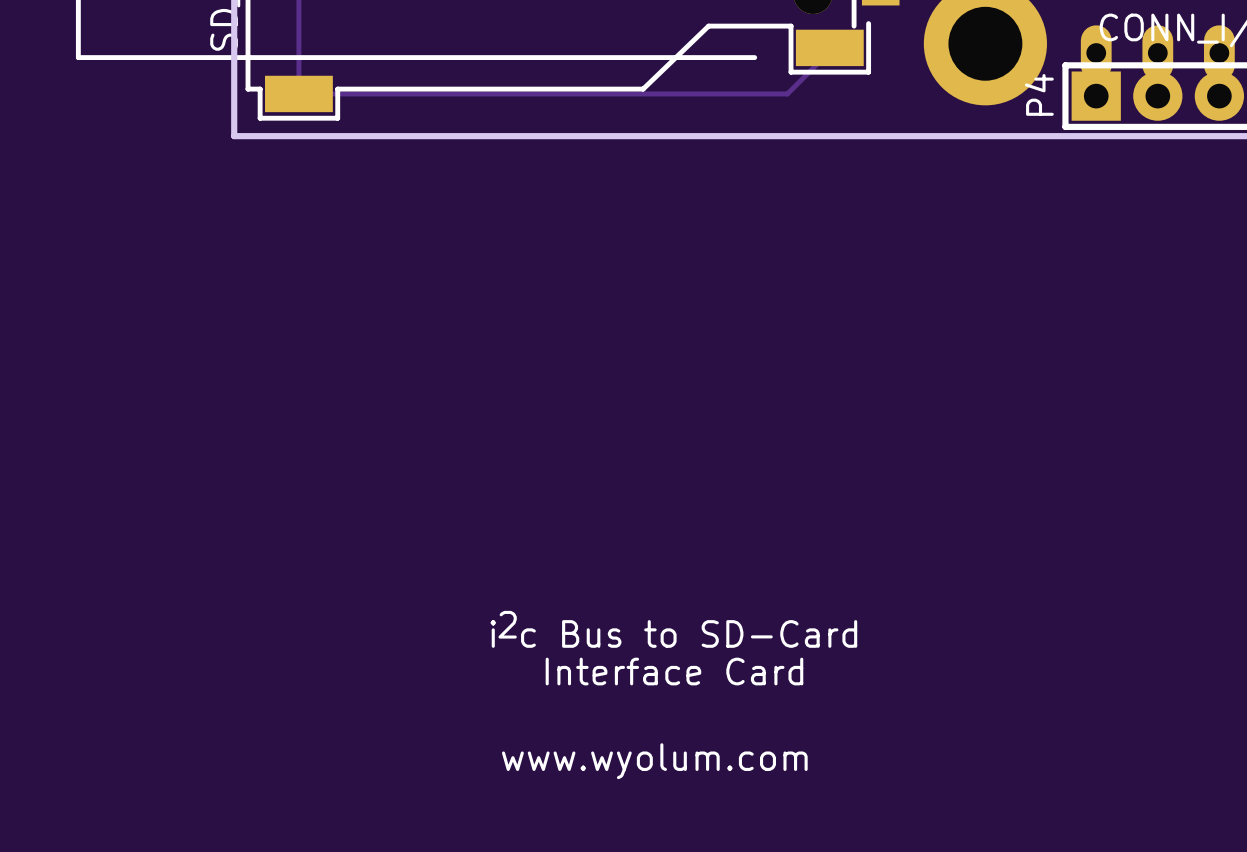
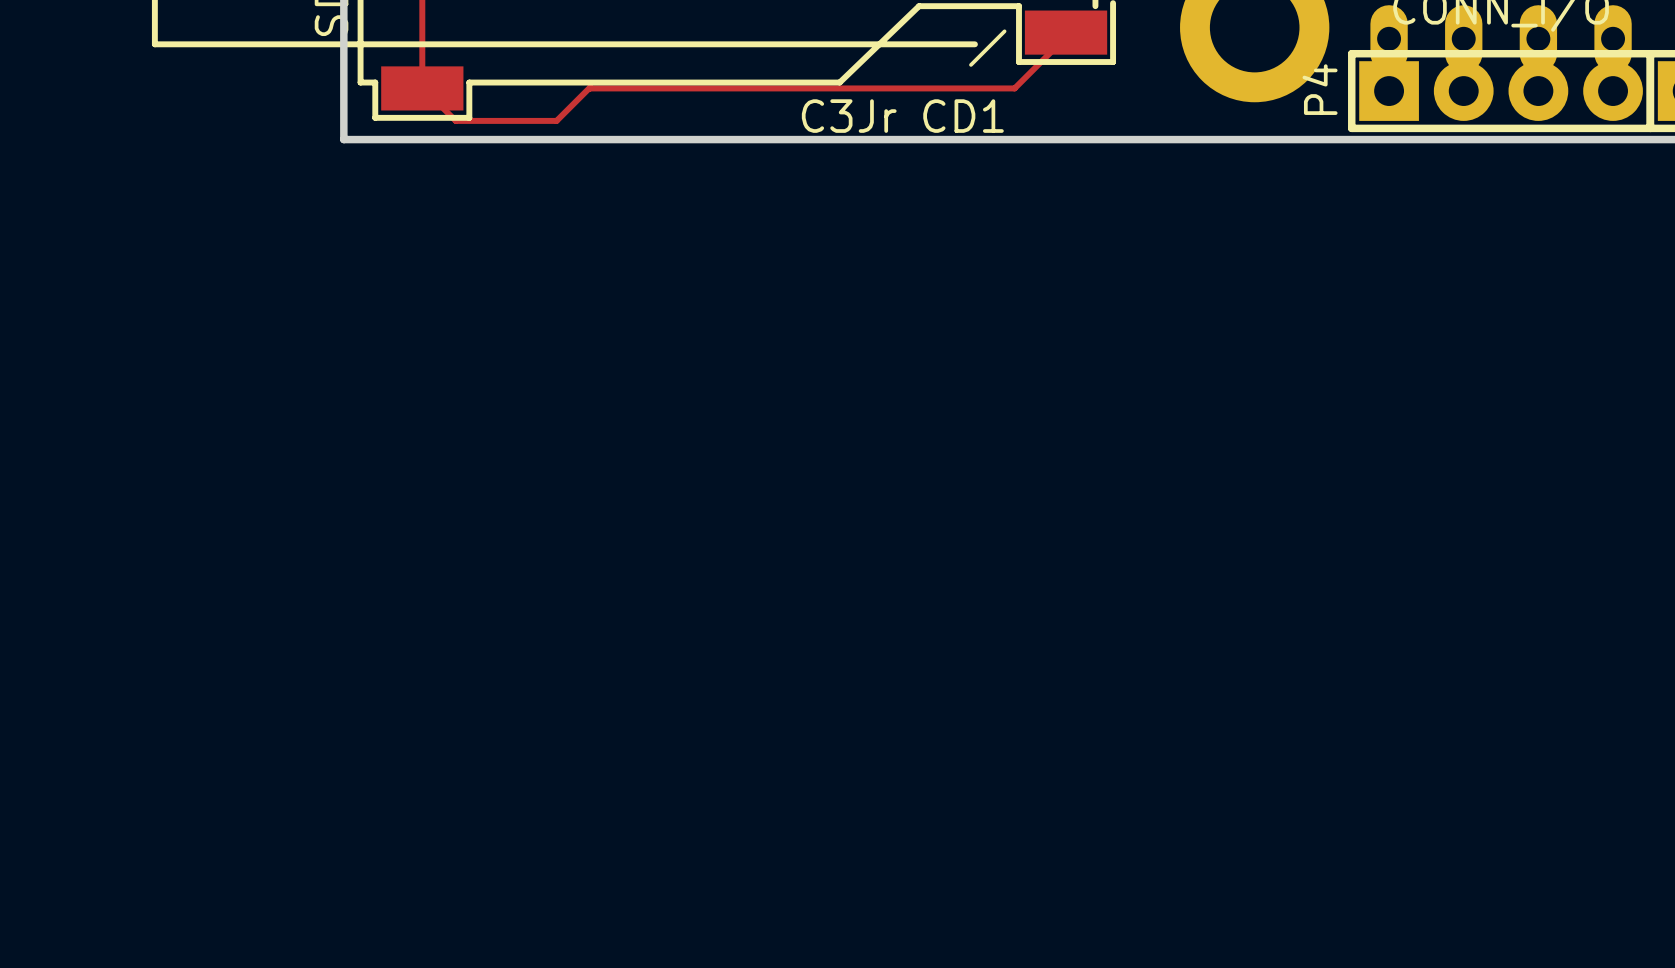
line: none -> (1004, 31) (970, 64)
track: (298, 93) (437, 93) -> (422, 87) (455, 120) (556, 120) (590, 88)
text: none -> C3Jr (849, 116)
text: none -> CD1 (963, 116)
text: 2 (507, 624) -> none
text: i c Bus to SD-Card (673, 633) -> none
text: Interface Card (674, 671) -> none
text: www.wyolum.com (654, 761) -> none

